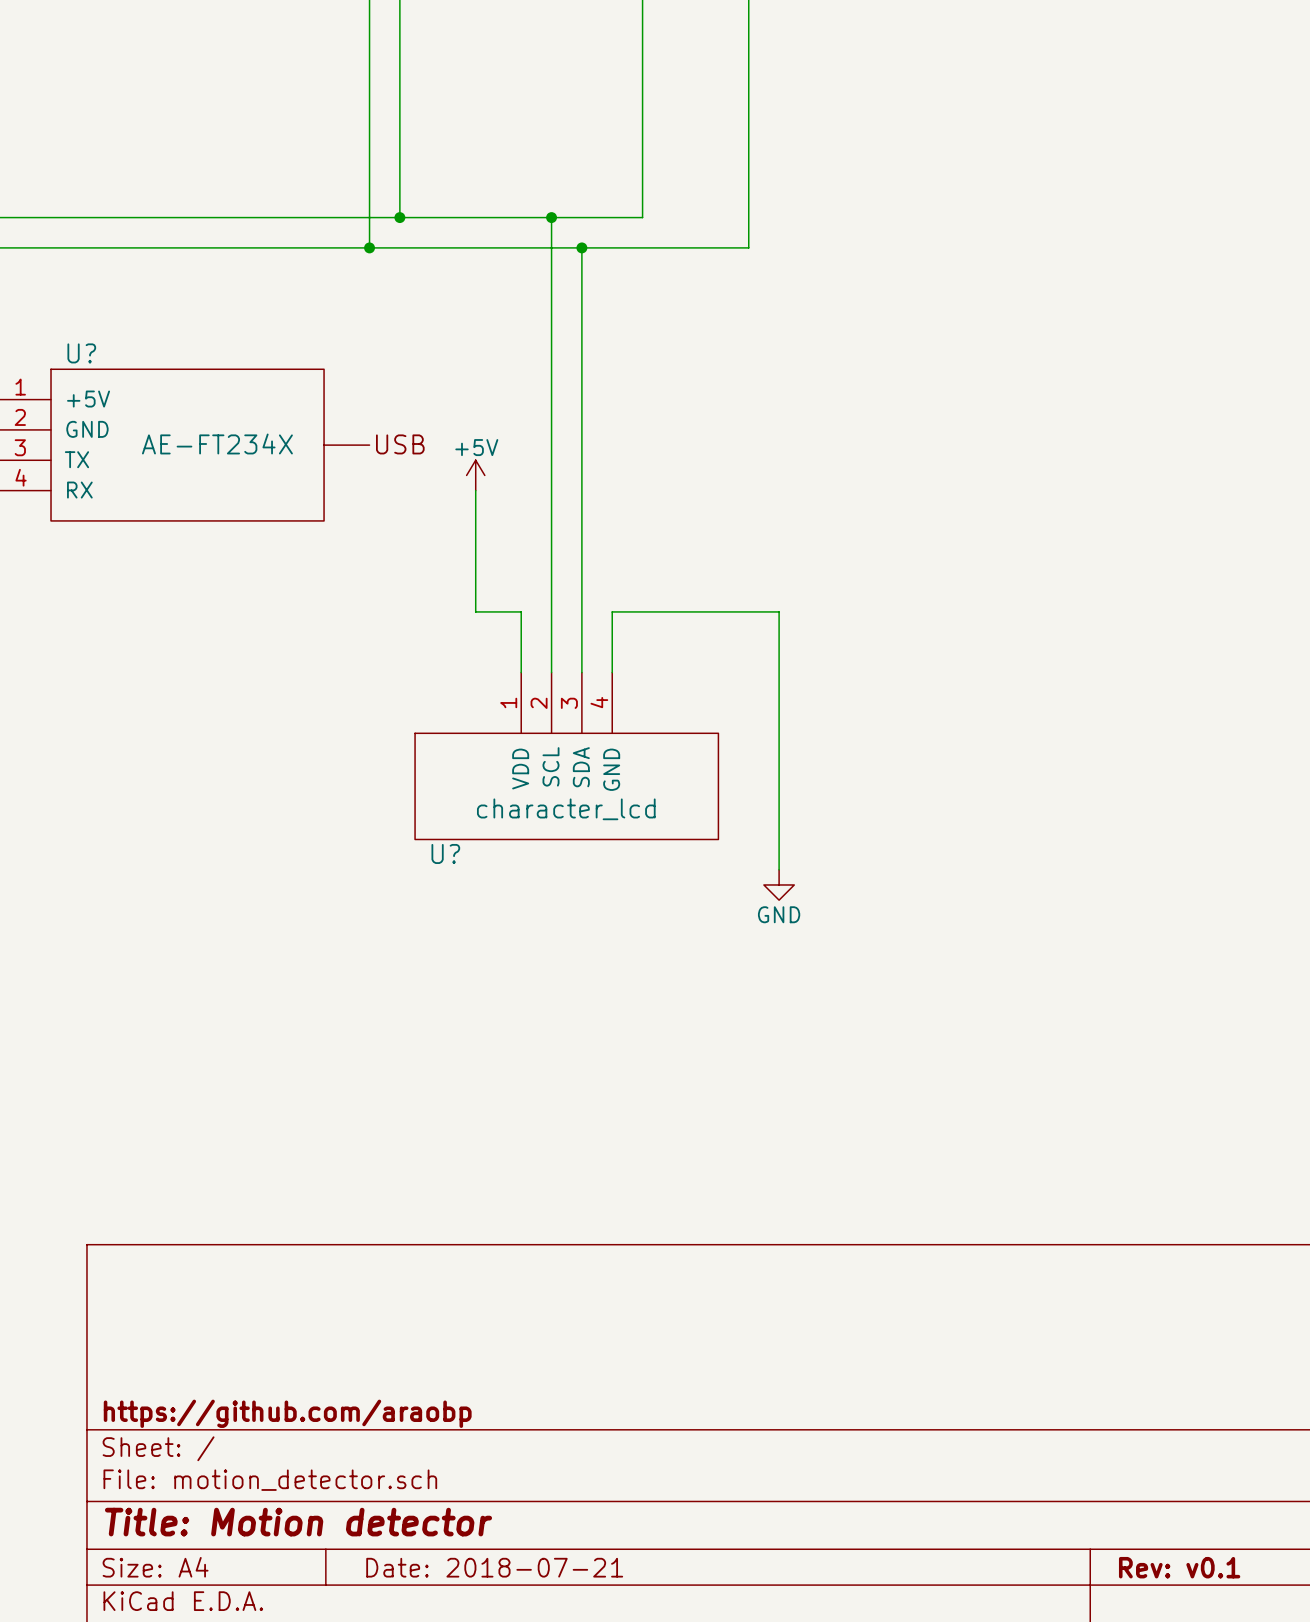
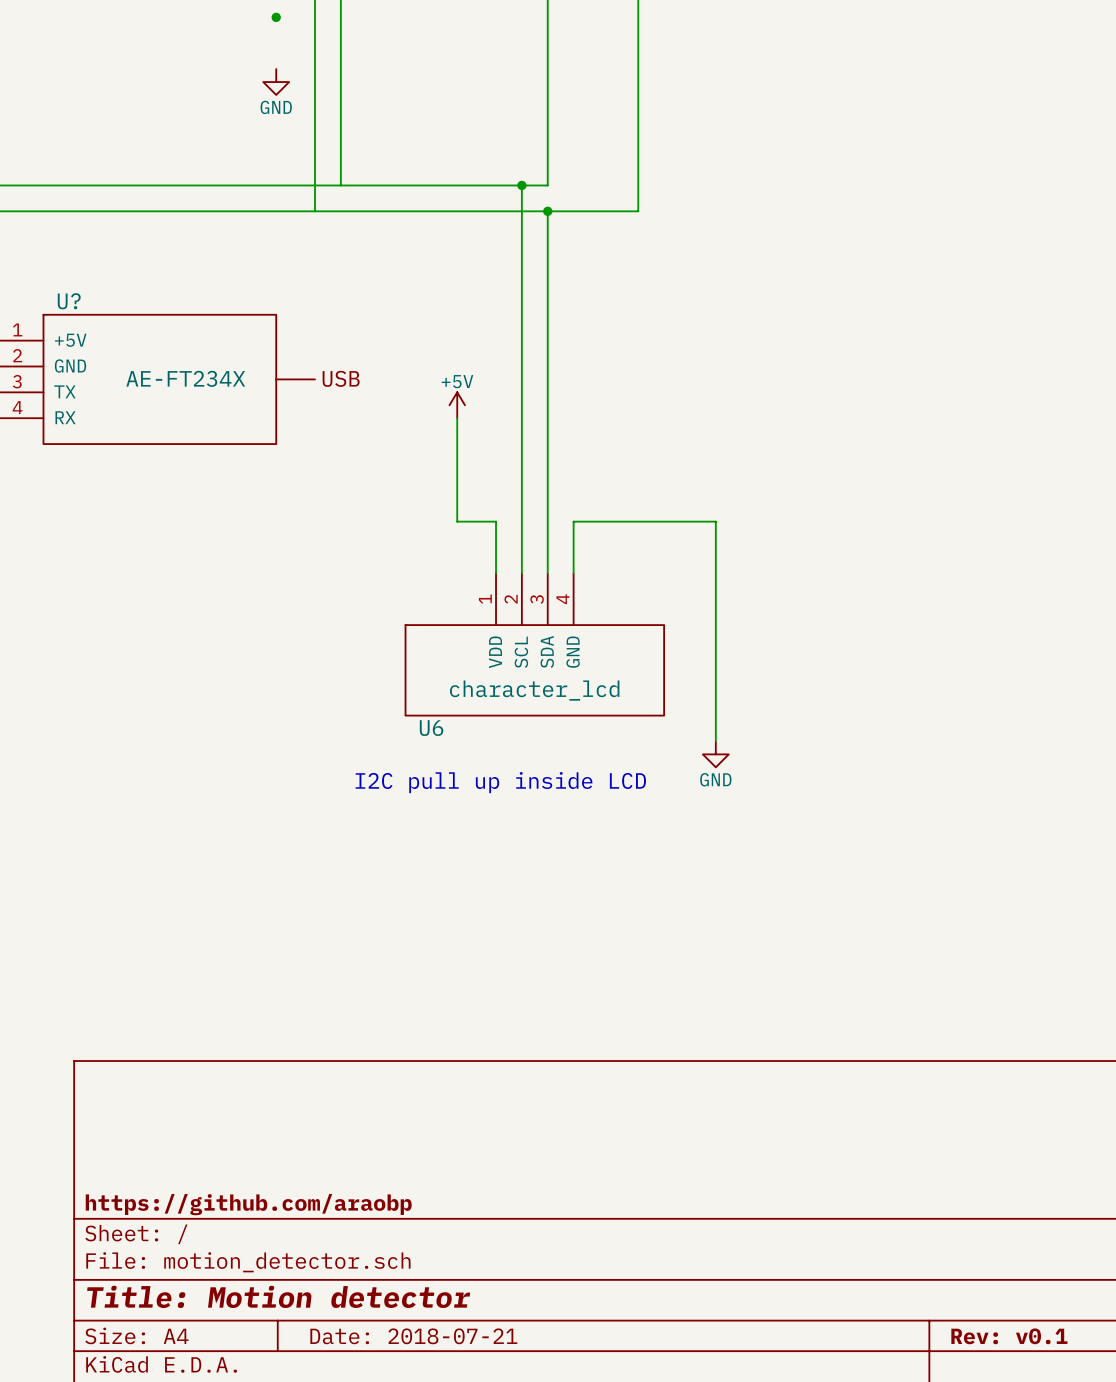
junction: none -> (276, 17)
power symbol: none -> GND (276, 82)
junction: (399, 217) -> none
wire: (551, 217) (551, 672) -> none
junction: (551, 217) -> none
wire: none -> (521, 185) (521, 521)
junction: none -> (521, 185)
junction: (369, 247) -> none
wire: (581, 247) (581, 611) -> (457, 418) (457, 521) (496, 521)
junction: (581, 247) -> none
wire: none -> (547, 211) (547, 573)
junction: none -> (547, 211)
power symbol position: +5V (475, 475) -> +5V (457, 405)
wire: (475, 490) (475, 611) (521, 611) (521, 672) -> none
wire: (612, 611) (672, 611) -> (573, 573) (573, 521)
wire: (779, 611) (779, 869) -> (664, 521) (715, 521) (715, 741)
U?: character_lcd (566, 756) -> none
U6: none -> character_lcd (534, 644)
power symbol position: GND (779, 884) -> GND (715, 754)
text: none -> I2C pull up inside LCD (500, 782)

